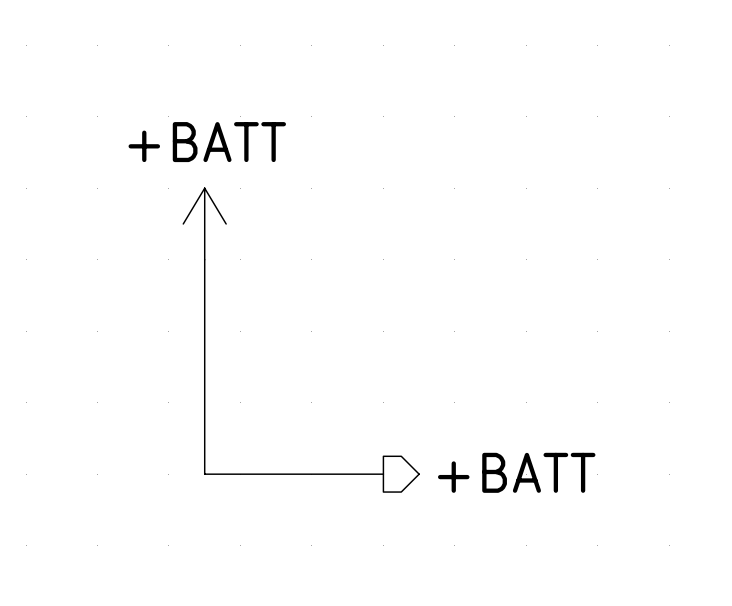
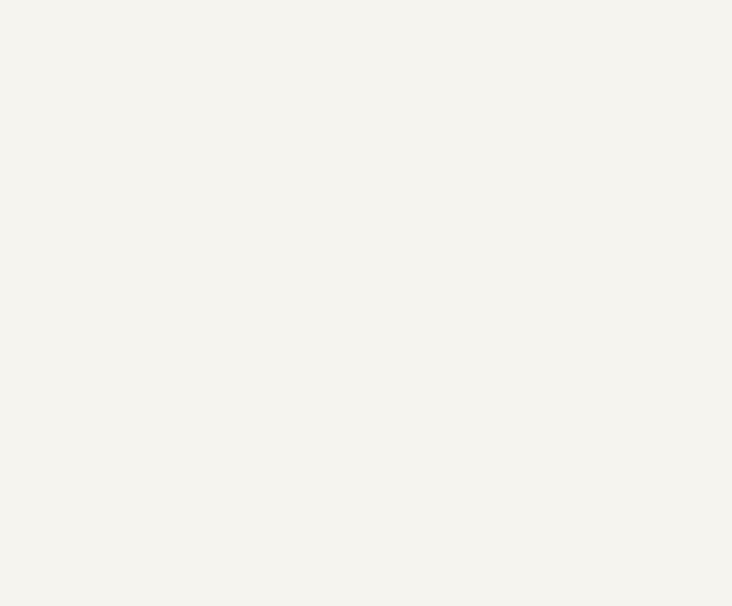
power symbol: +BATT (204, 223) -> none
wire: (204, 259) (204, 474) (383, 474) -> none
hierarchical label: +BATT (516, 472) -> none

